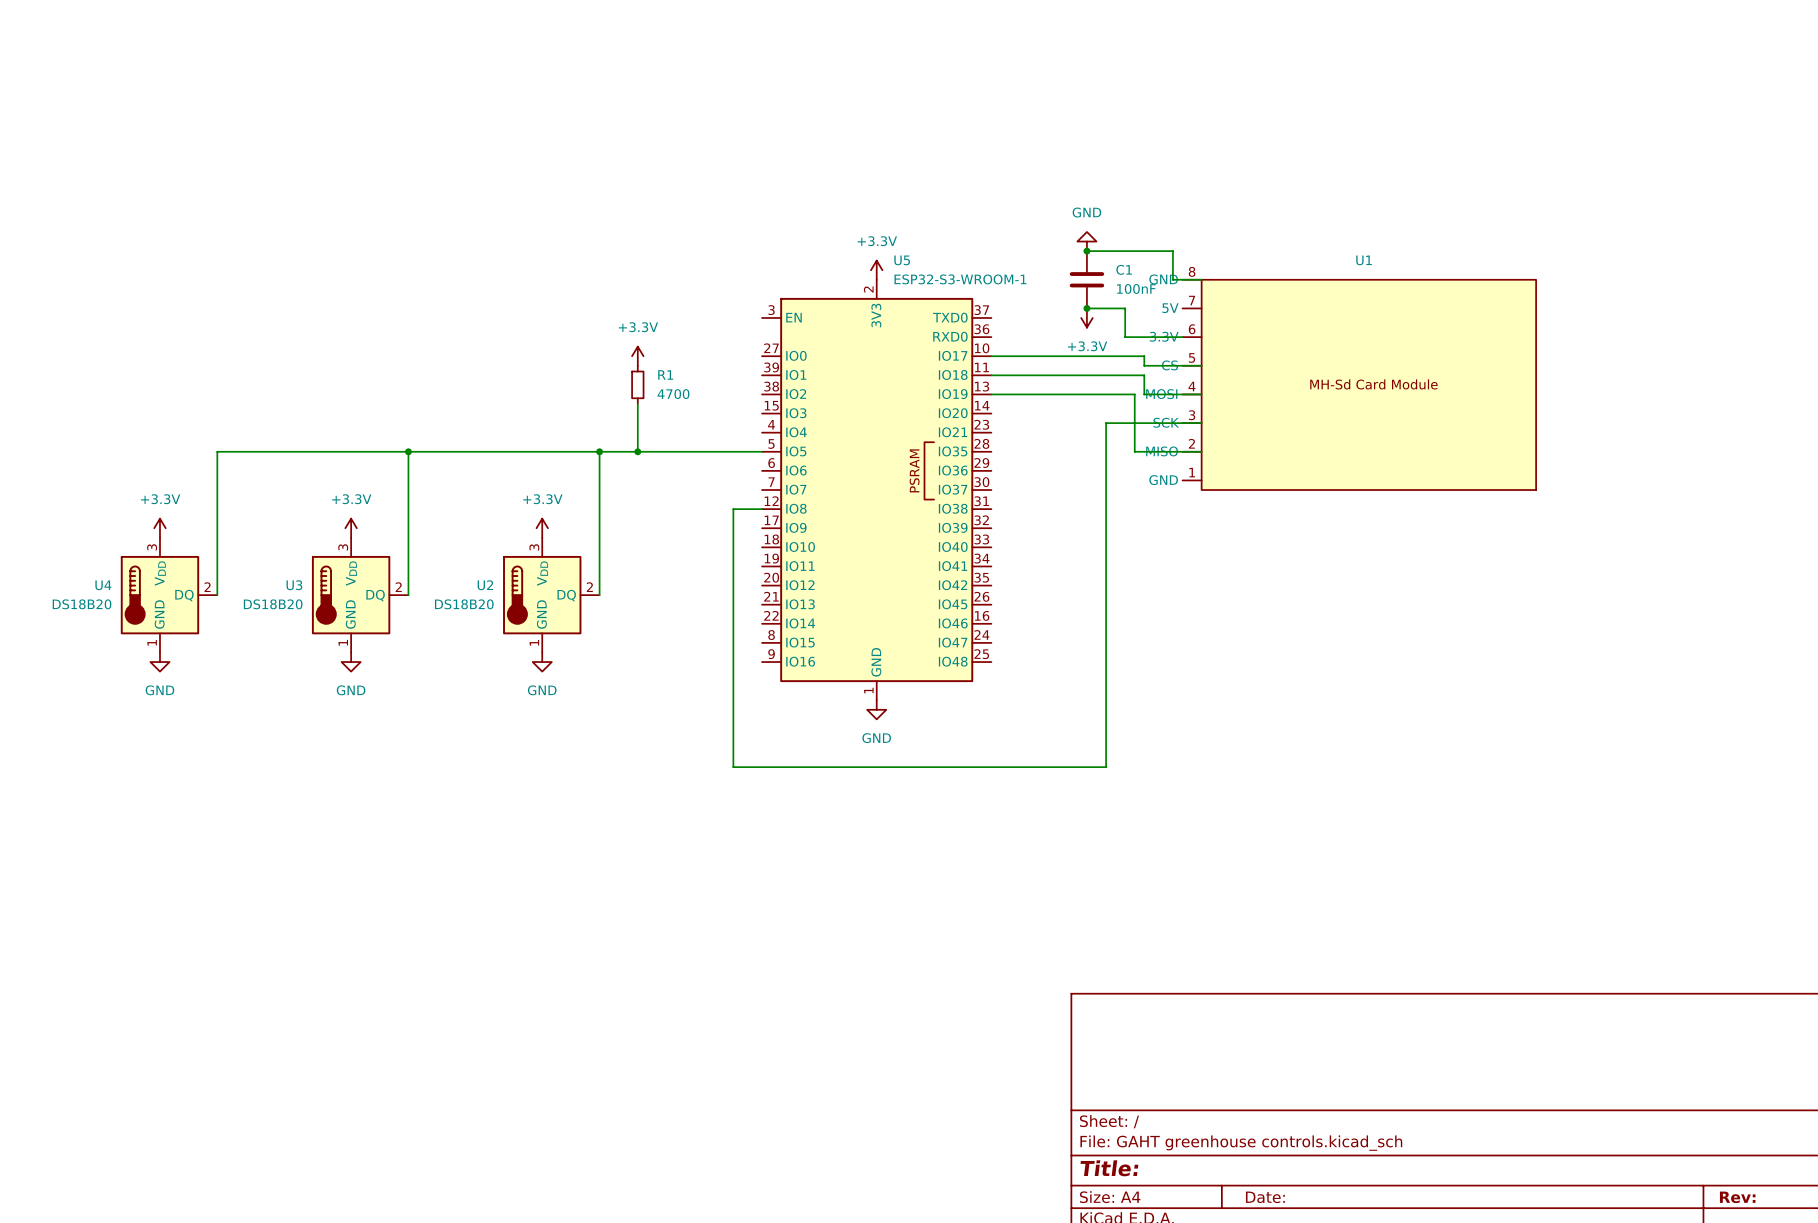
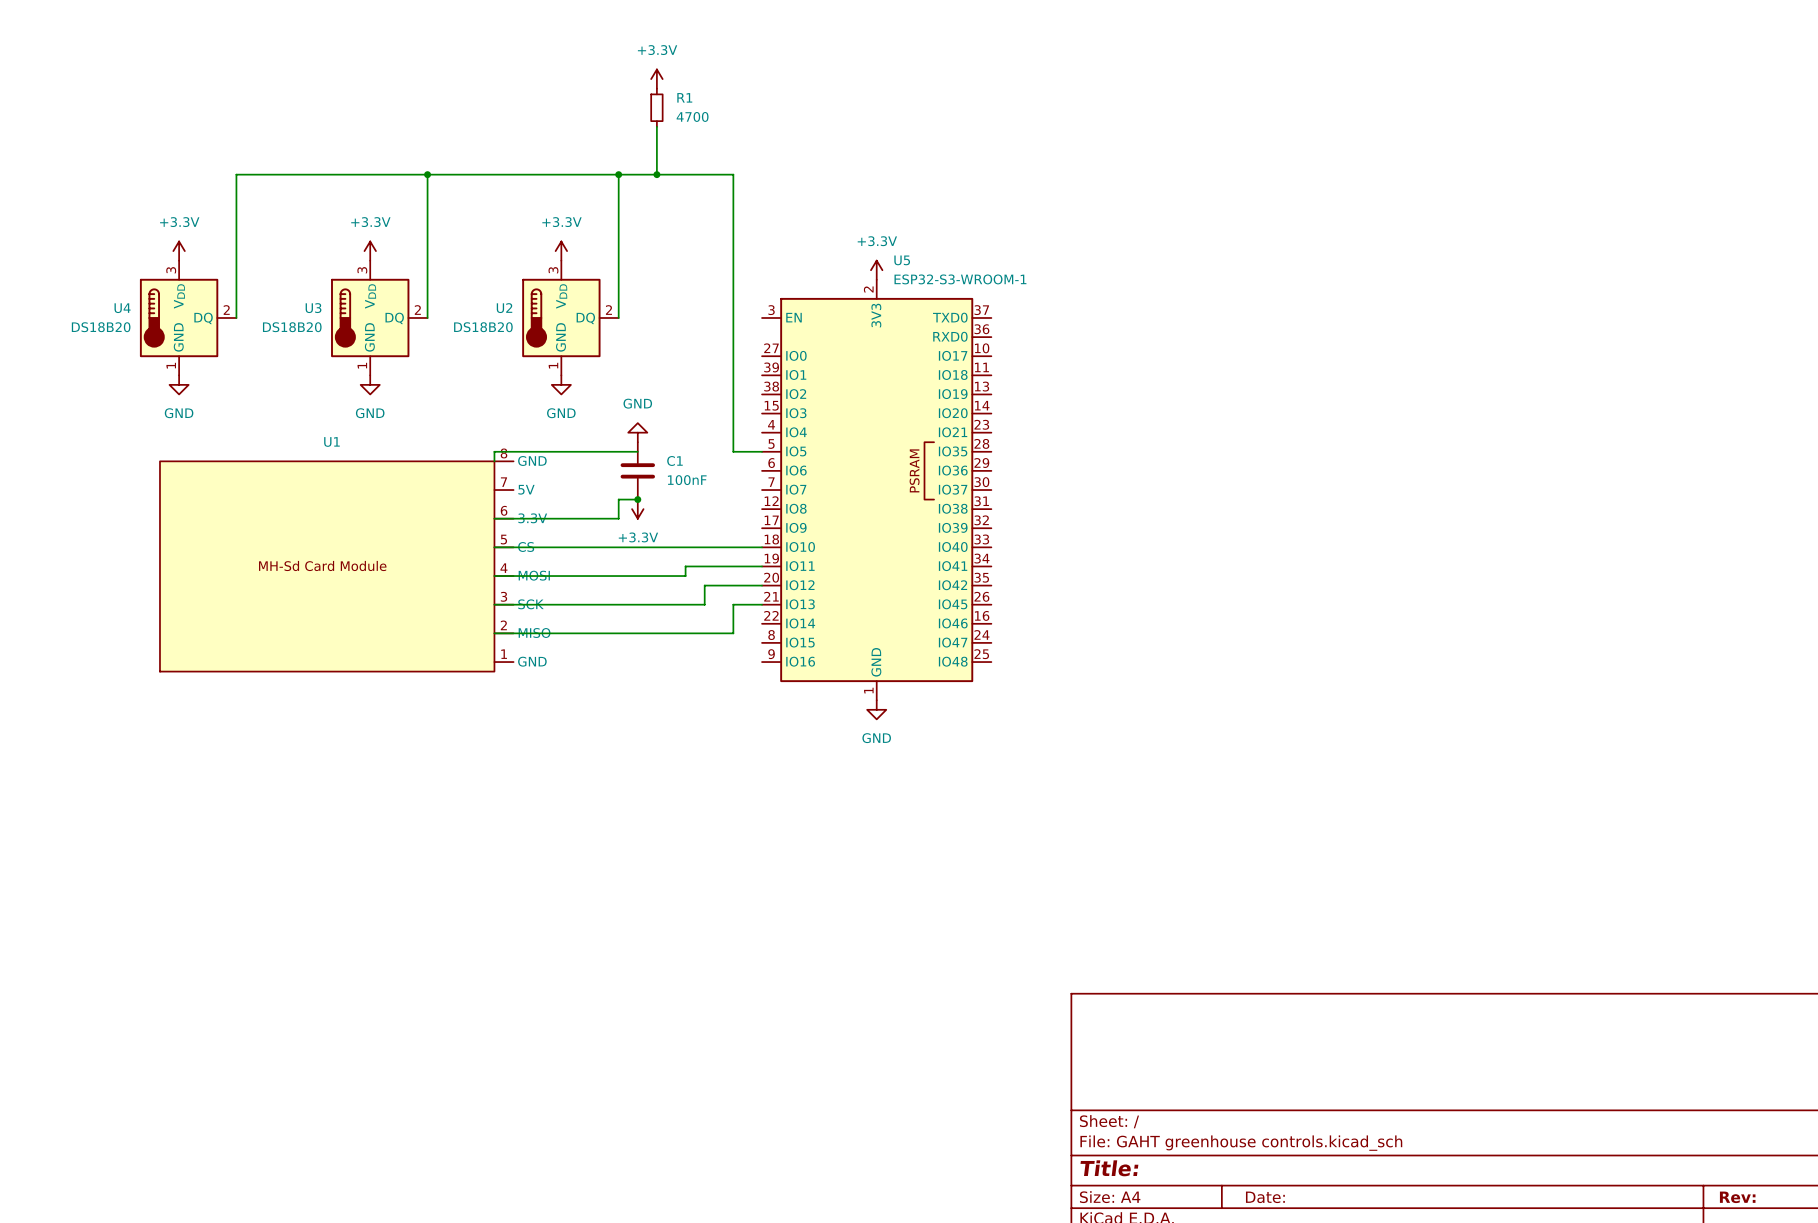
power symbol: none -> +3.3V (656, 79)
wire: none -> (656, 126) (656, 174)
wire: none -> (427, 174) (427, 317)
junction: none -> (427, 174)
wire: none -> (618, 174) (618, 317)
junction: none -> (618, 174)
junction: none -> (656, 174)
power symbol: GND (1086, 241) -> none
power symbol: none -> +3.3V (179, 251)
power symbol: none -> +3.3V (370, 251)
power symbol: none -> +3.3V (561, 251)
wire: (1086, 251) (1172, 251) (1172, 279) (1201, 279) -> none
junction: (1086, 251) -> none
C1 position: (1086, 279) -> (637, 470)
wire: (1086, 308) (1125, 308) (1125, 337) (1182, 337) -> none
junction: (1086, 308) -> none
power symbol: +3.3V (1086, 317) -> none
power symbol: +3.3V (637, 356) -> none
wire: (991, 356) (1144, 356) (1144, 365) (1201, 365) -> none
wire: (991, 375) (1144, 375) (1144, 394) (1201, 394) -> none
power symbol: none -> GND (179, 384)
power symbol: none -> GND (370, 384)
power symbol: none -> GND (561, 384)
R1 position: (637, 384) -> (656, 107)
U1 position: (1359, 384) -> (336, 566)
U1 flip: as is (1368, 384) -> left-right (327, 566)
wire: (991, 394) (1134, 394) (1134, 451) (1201, 451) -> none
wire: (637, 404) (637, 451) (733, 451) -> (236, 317) (236, 174) (733, 174) (733, 451)
wire: (1201, 423) (1106, 423) (1106, 767) (733, 767) (733, 633) -> (494, 633) (733, 633)
power symbol: none -> GND (637, 432)
junction: (408, 451) -> none
wire: (494, 451) (217, 451) (217, 595) -> (494, 451) (494, 461)
wire: (599, 451) (599, 595) -> none
junction: (599, 451) -> none
junction: (637, 451) -> none
wire: none -> (637, 499) (618, 499) (618, 518) (494, 518)
junction: none -> (637, 499)
power symbol: none -> +3.3V (637, 509)
wire: (762, 509) (733, 509) (733, 604) -> (762, 604) (733, 604)
power symbol: +3.3V (159, 528) -> none
power symbol: +3.3V (351, 528) -> none
power symbol: +3.3V (542, 528) -> none
wire: none -> (494, 547) (762, 547)
wire: none -> (762, 566) (685, 566) (685, 576) (494, 576)
wire: none -> (762, 585) (704, 585) (704, 604) (494, 604)
U4 position: (169, 595) -> (188, 317)
U3 position: (360, 595) -> (379, 317)
U2 position: (551, 595) -> (570, 317)
power symbol: GND (159, 662) -> none
power symbol: GND (351, 662) -> none
power symbol: GND (542, 662) -> none

